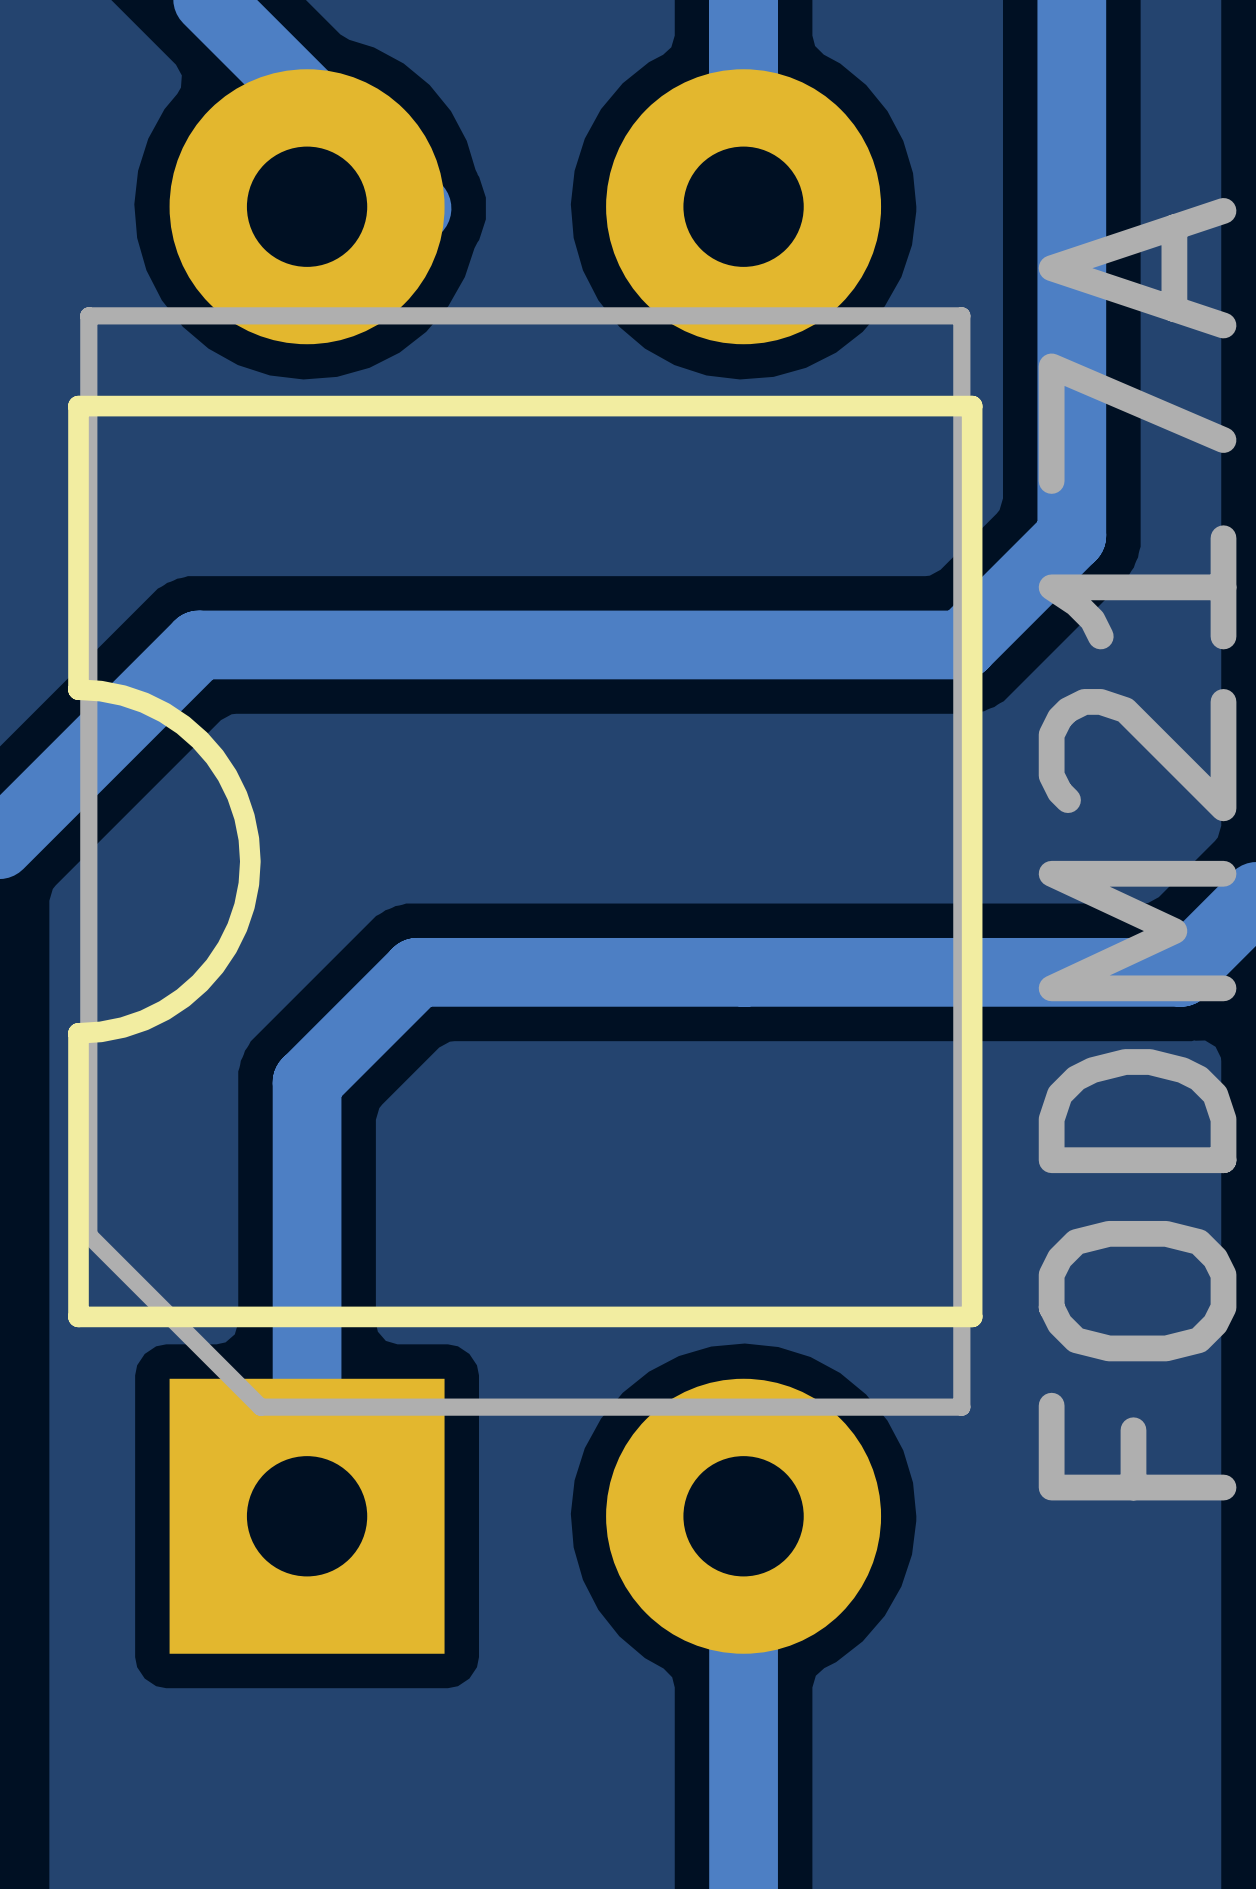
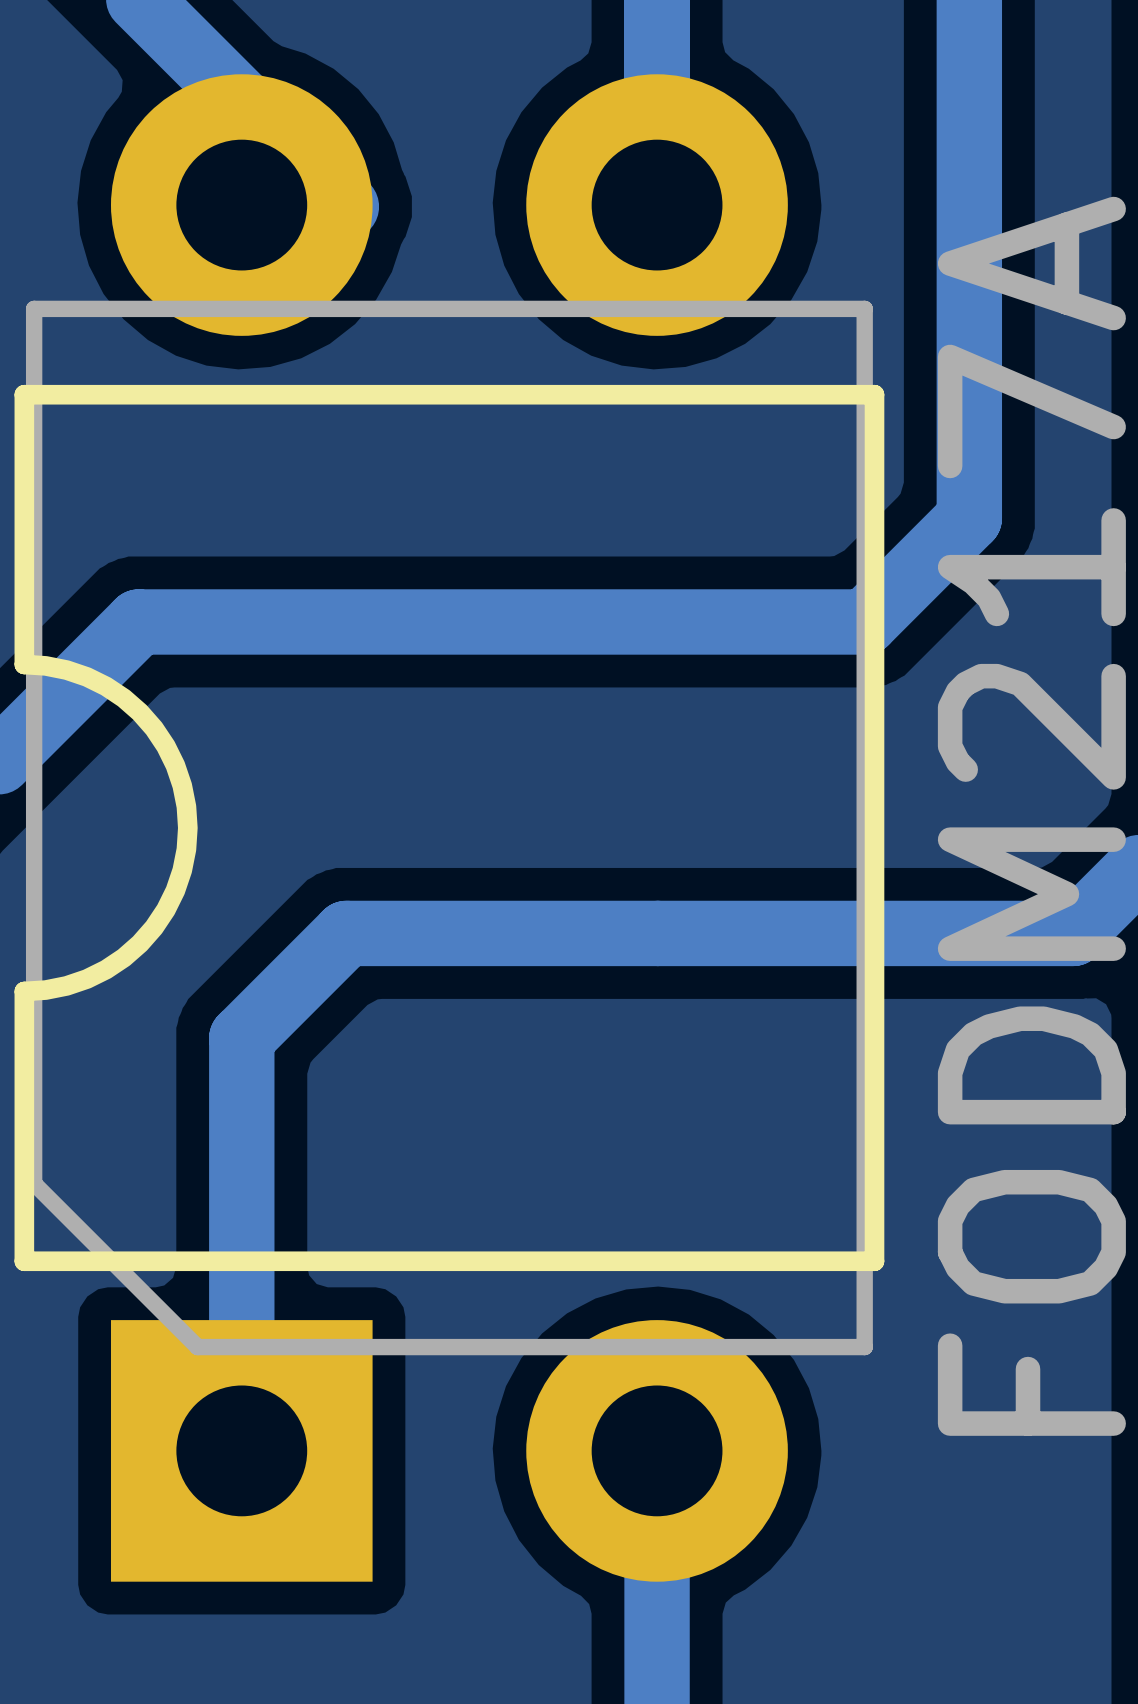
part footprint: [68, 69, 983, 1654] -> [14, 74, 885, 1582]

